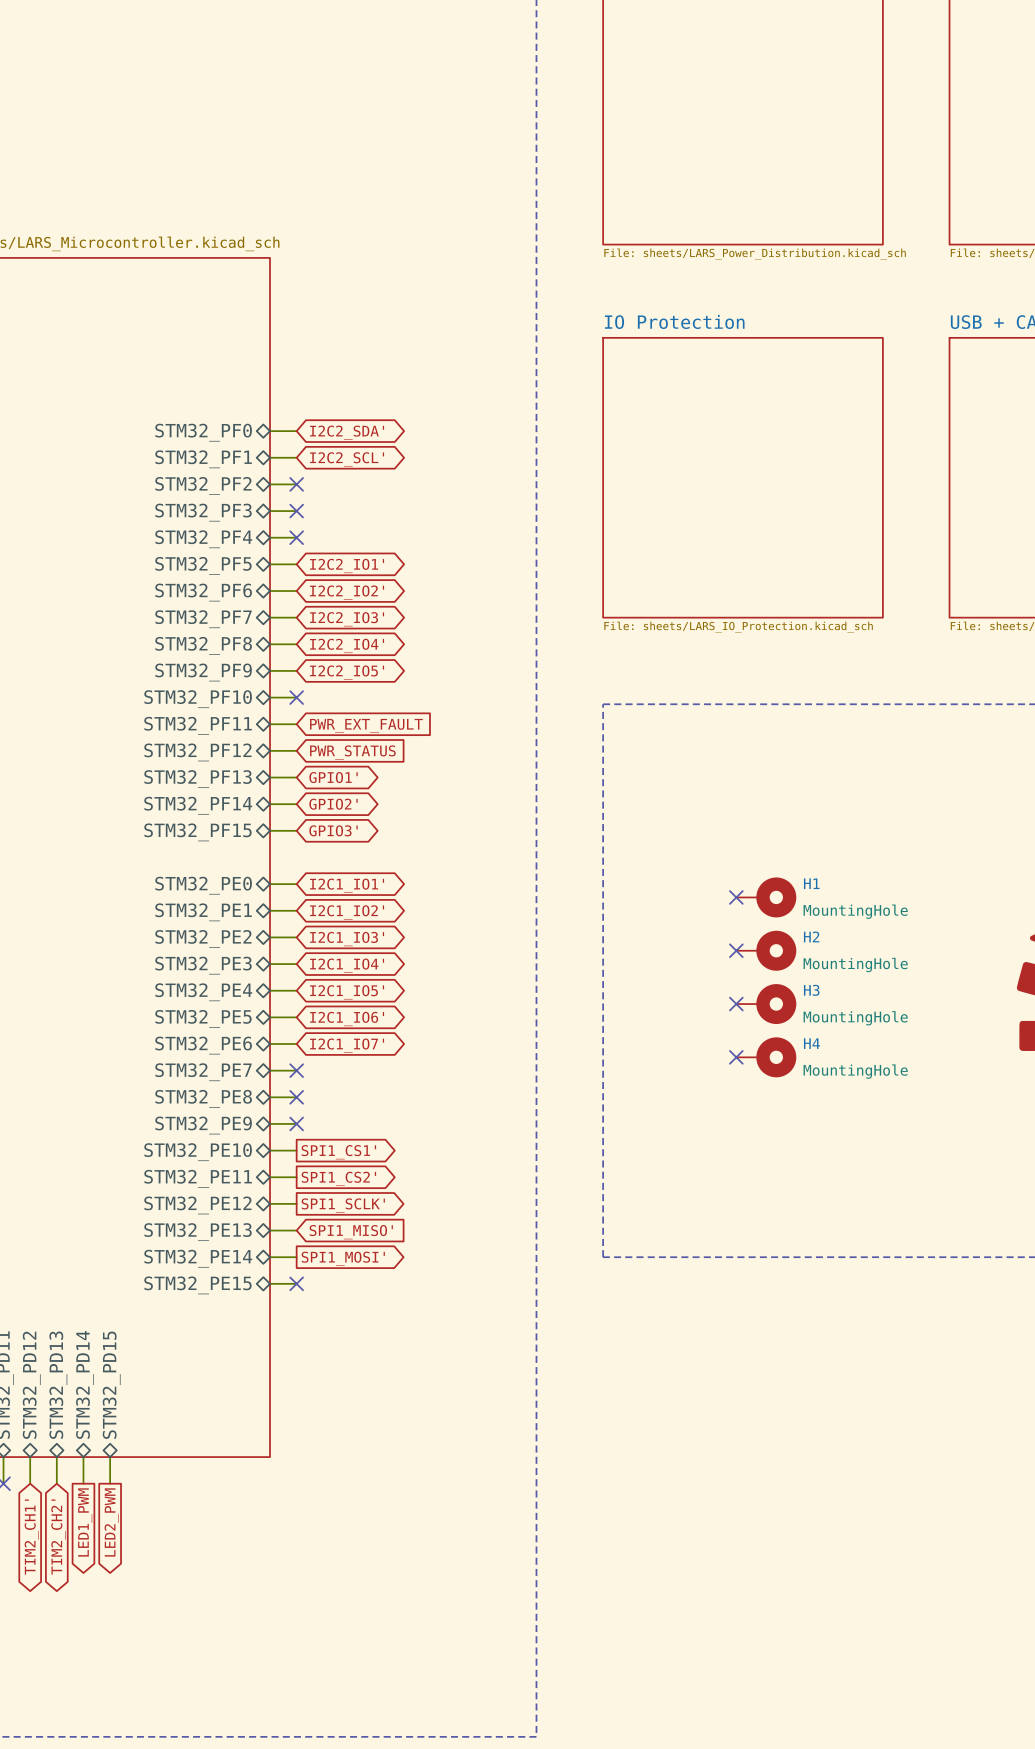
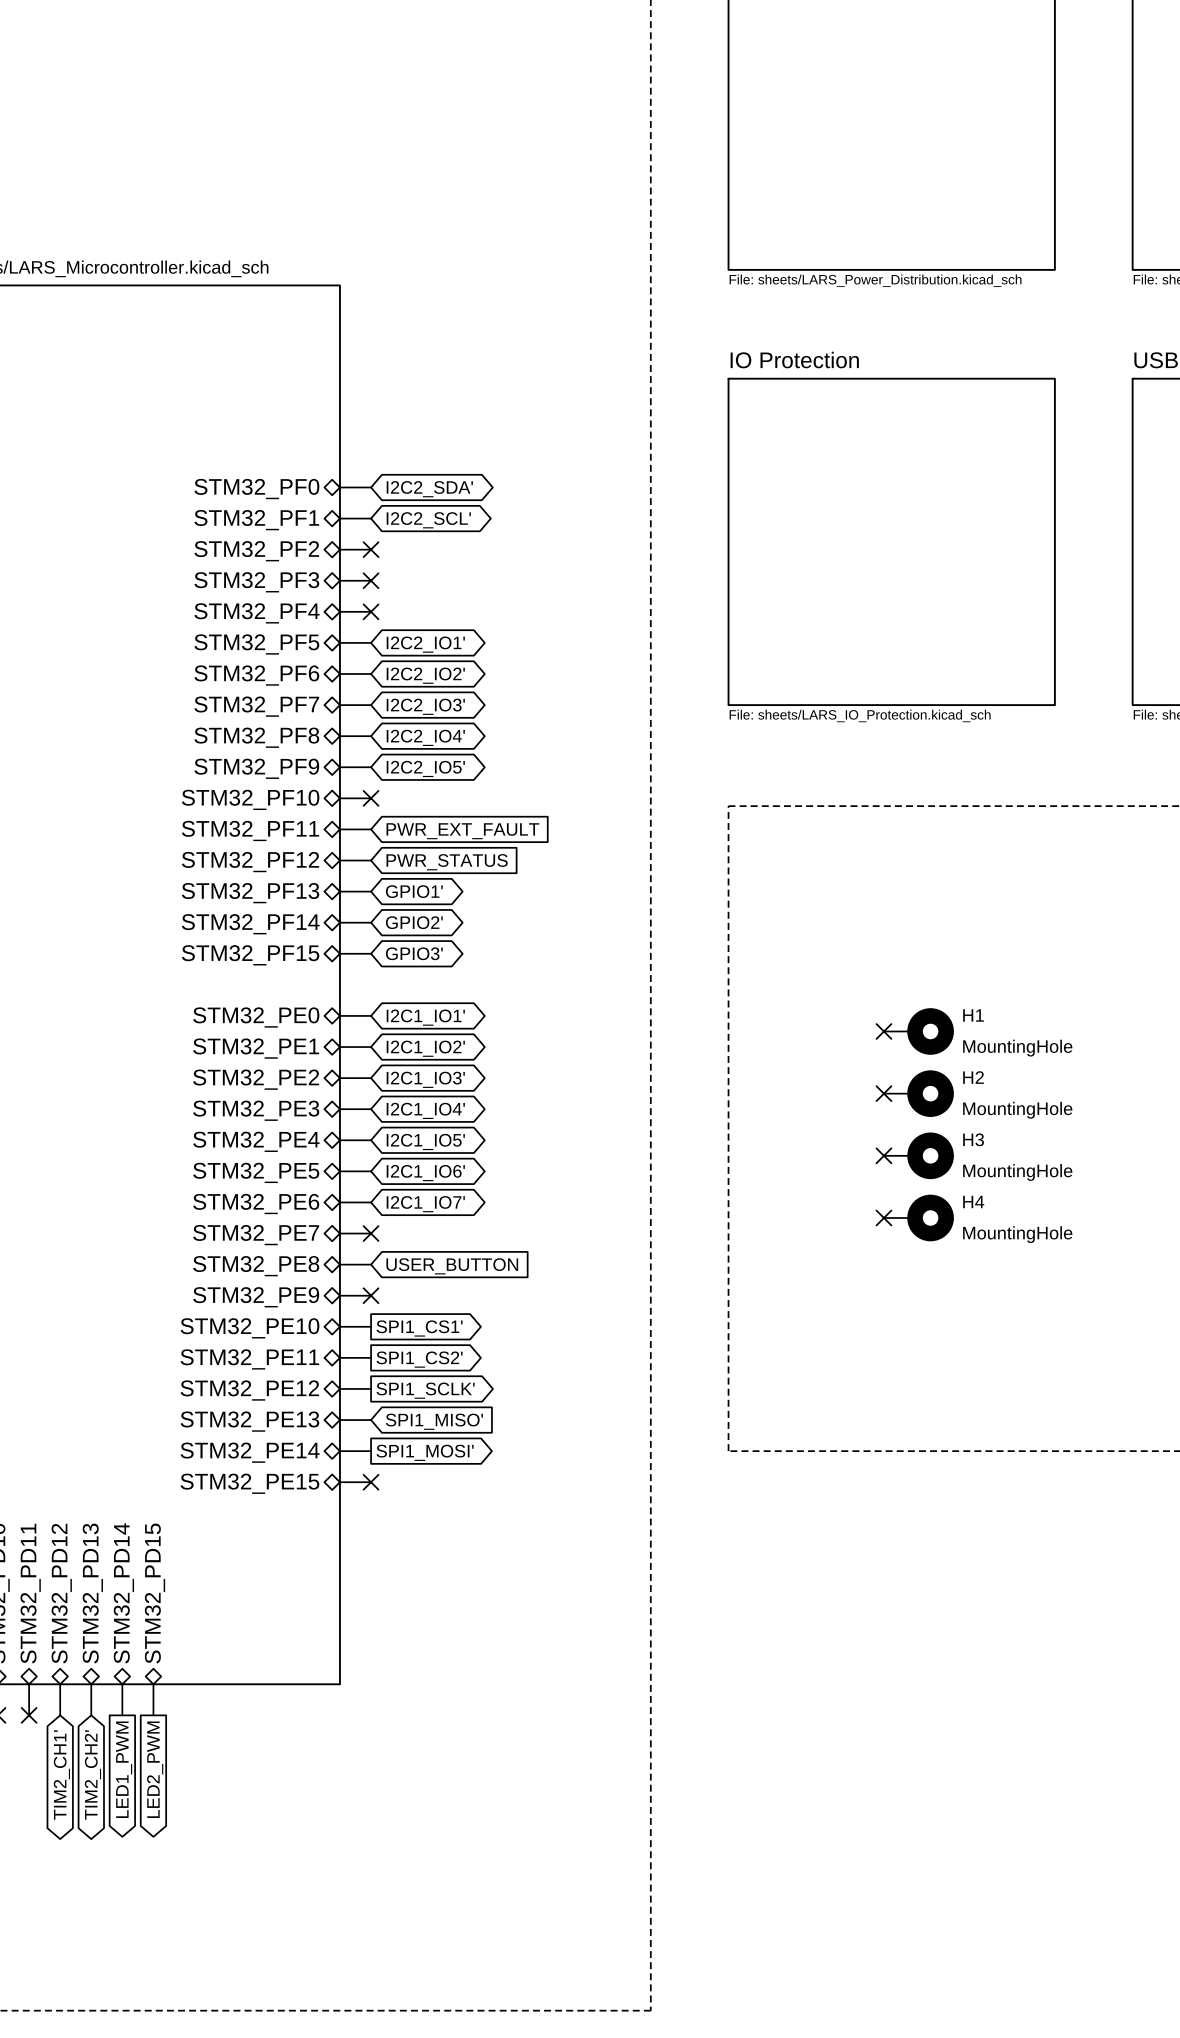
no-connect mark: (296, 1097) -> none
global label: none -> USER_BUTTON (452, 1266)

